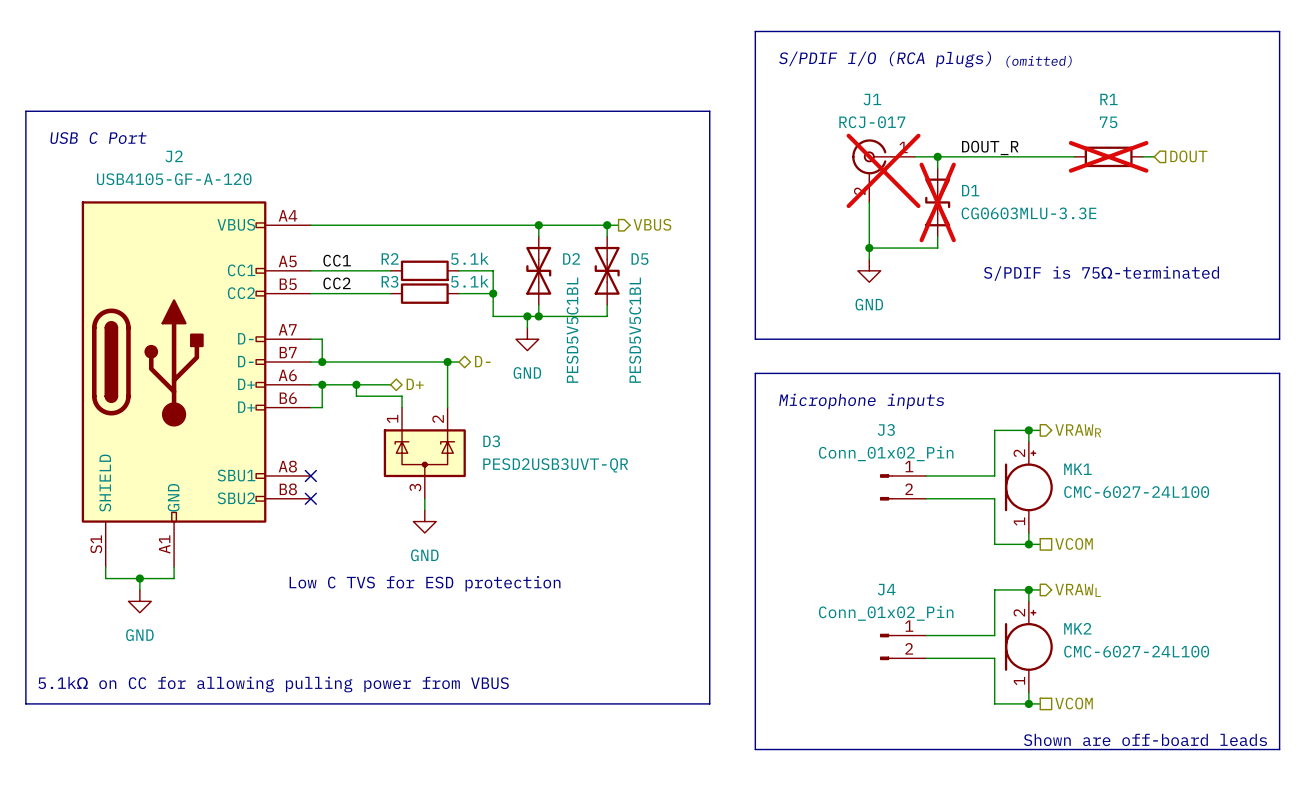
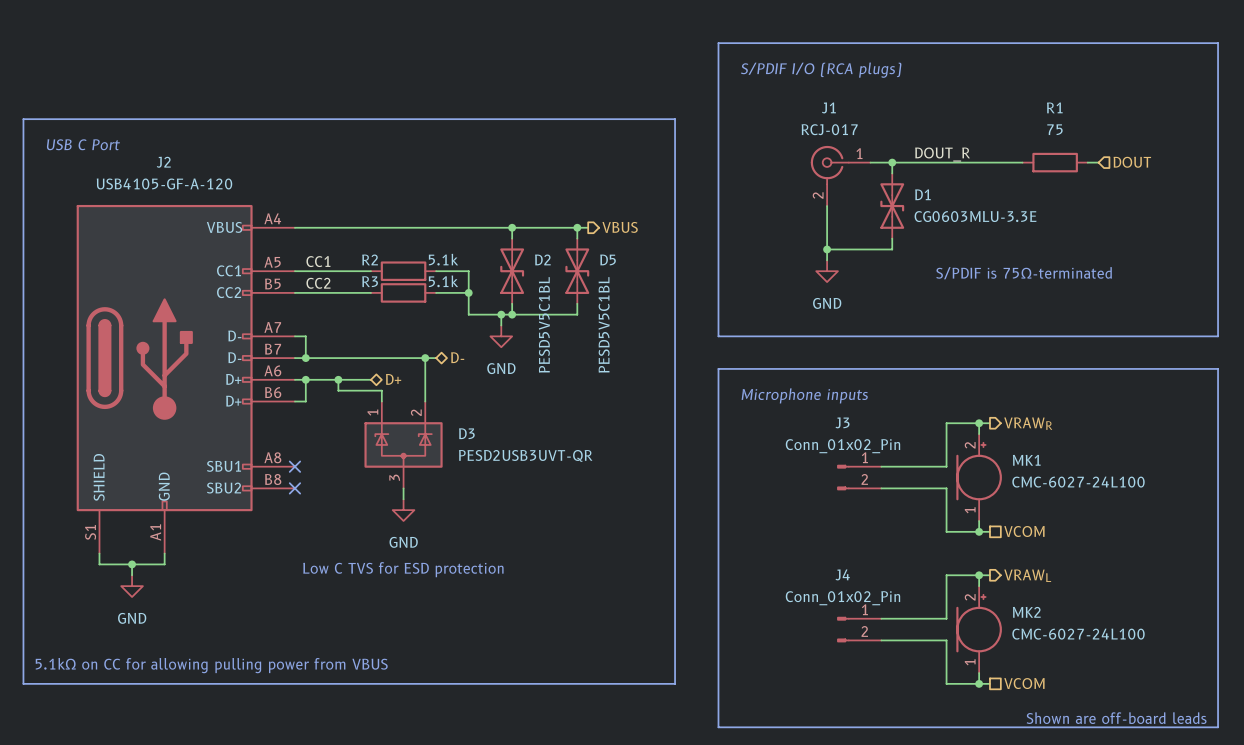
text: S/PDIF I/O (RCA plugs) (omitted) (925, 59) -> S/PDIF I/O (RCA plugs) (821, 70)
R1 do-not-place cross: (1108, 156) -> none
J1 do-not-place cross: (883, 170) -> none
D1 do-not-place cross: (937, 202) -> none

